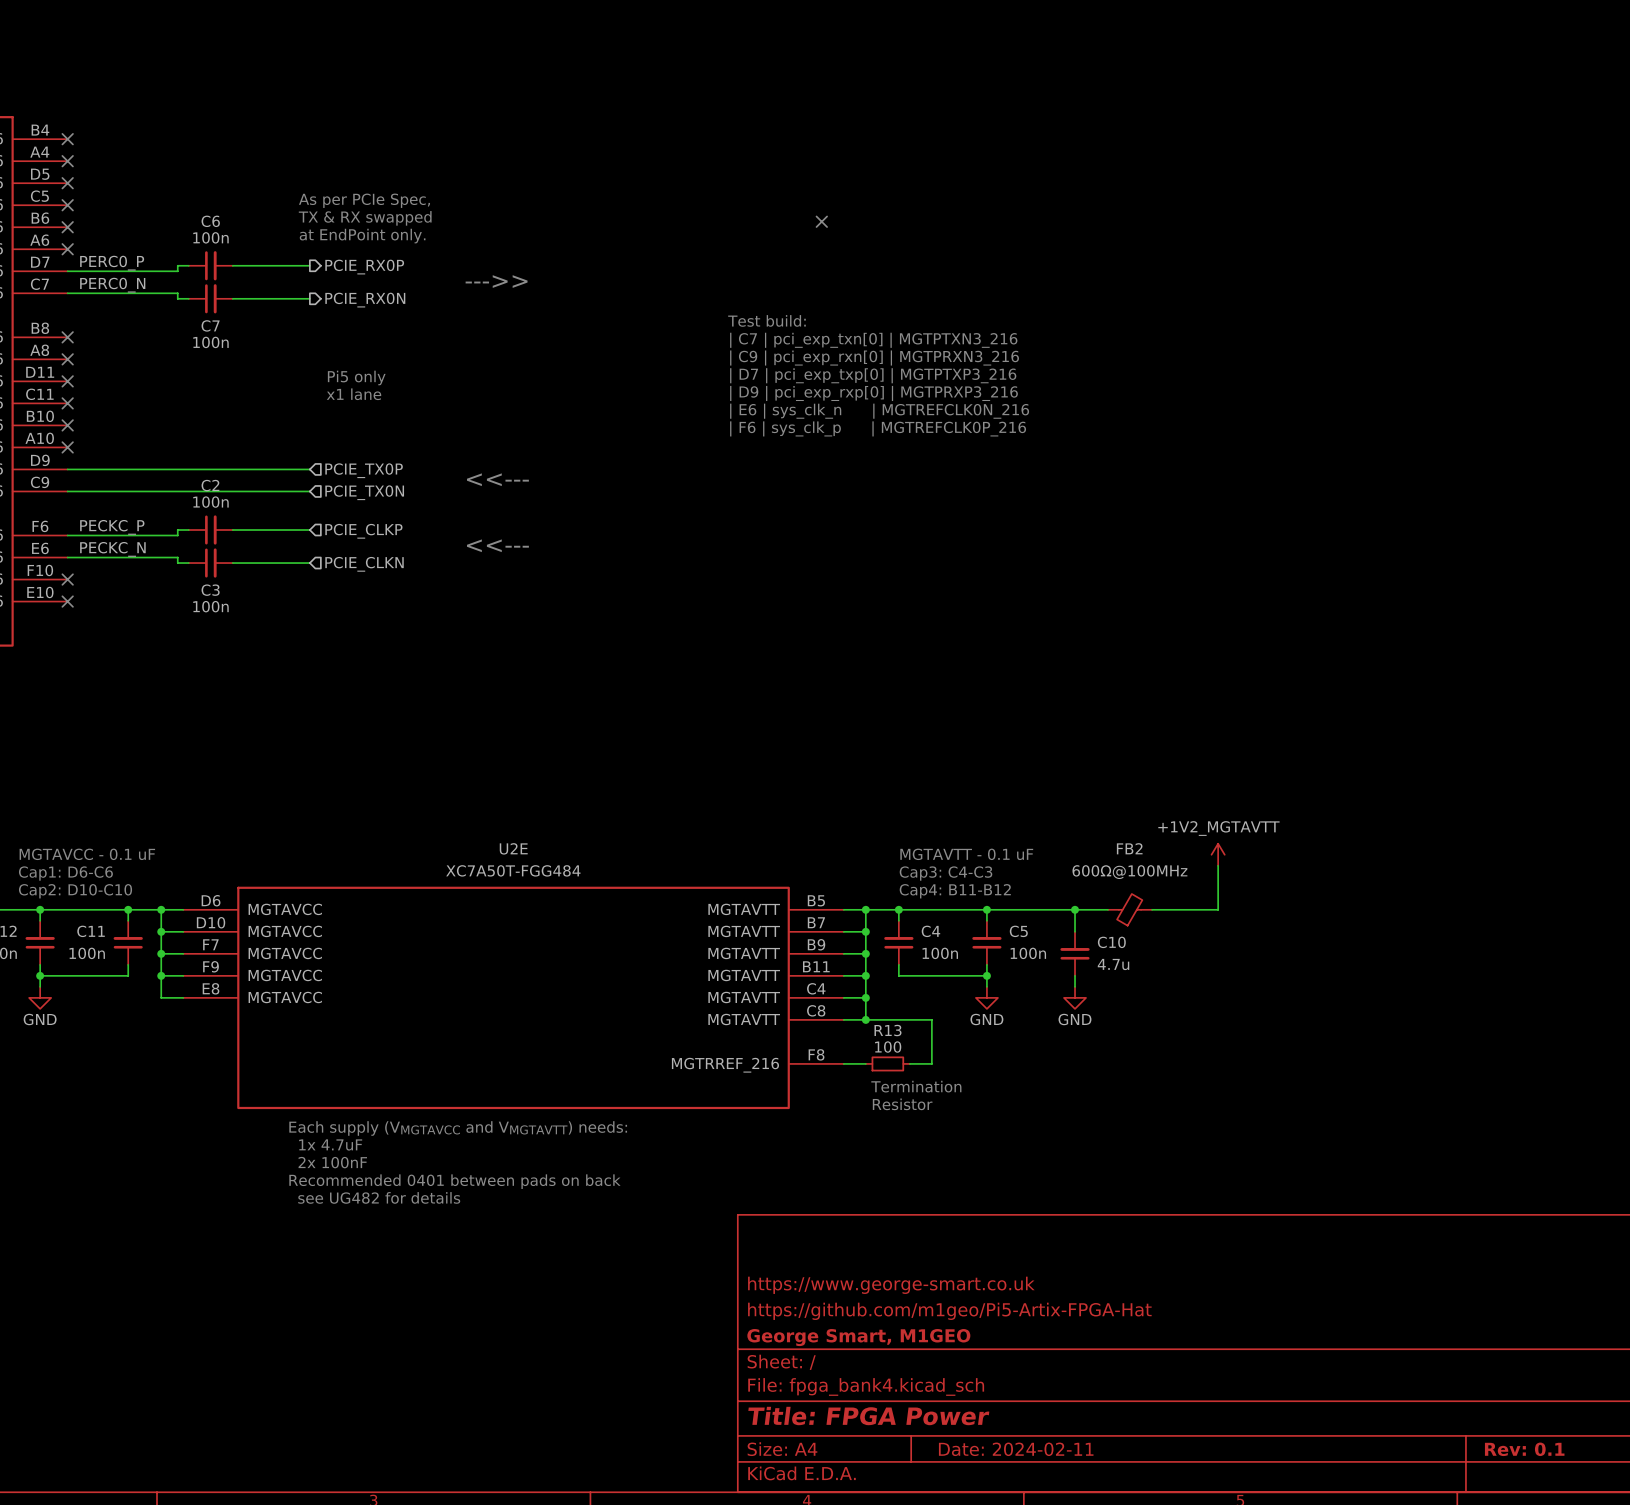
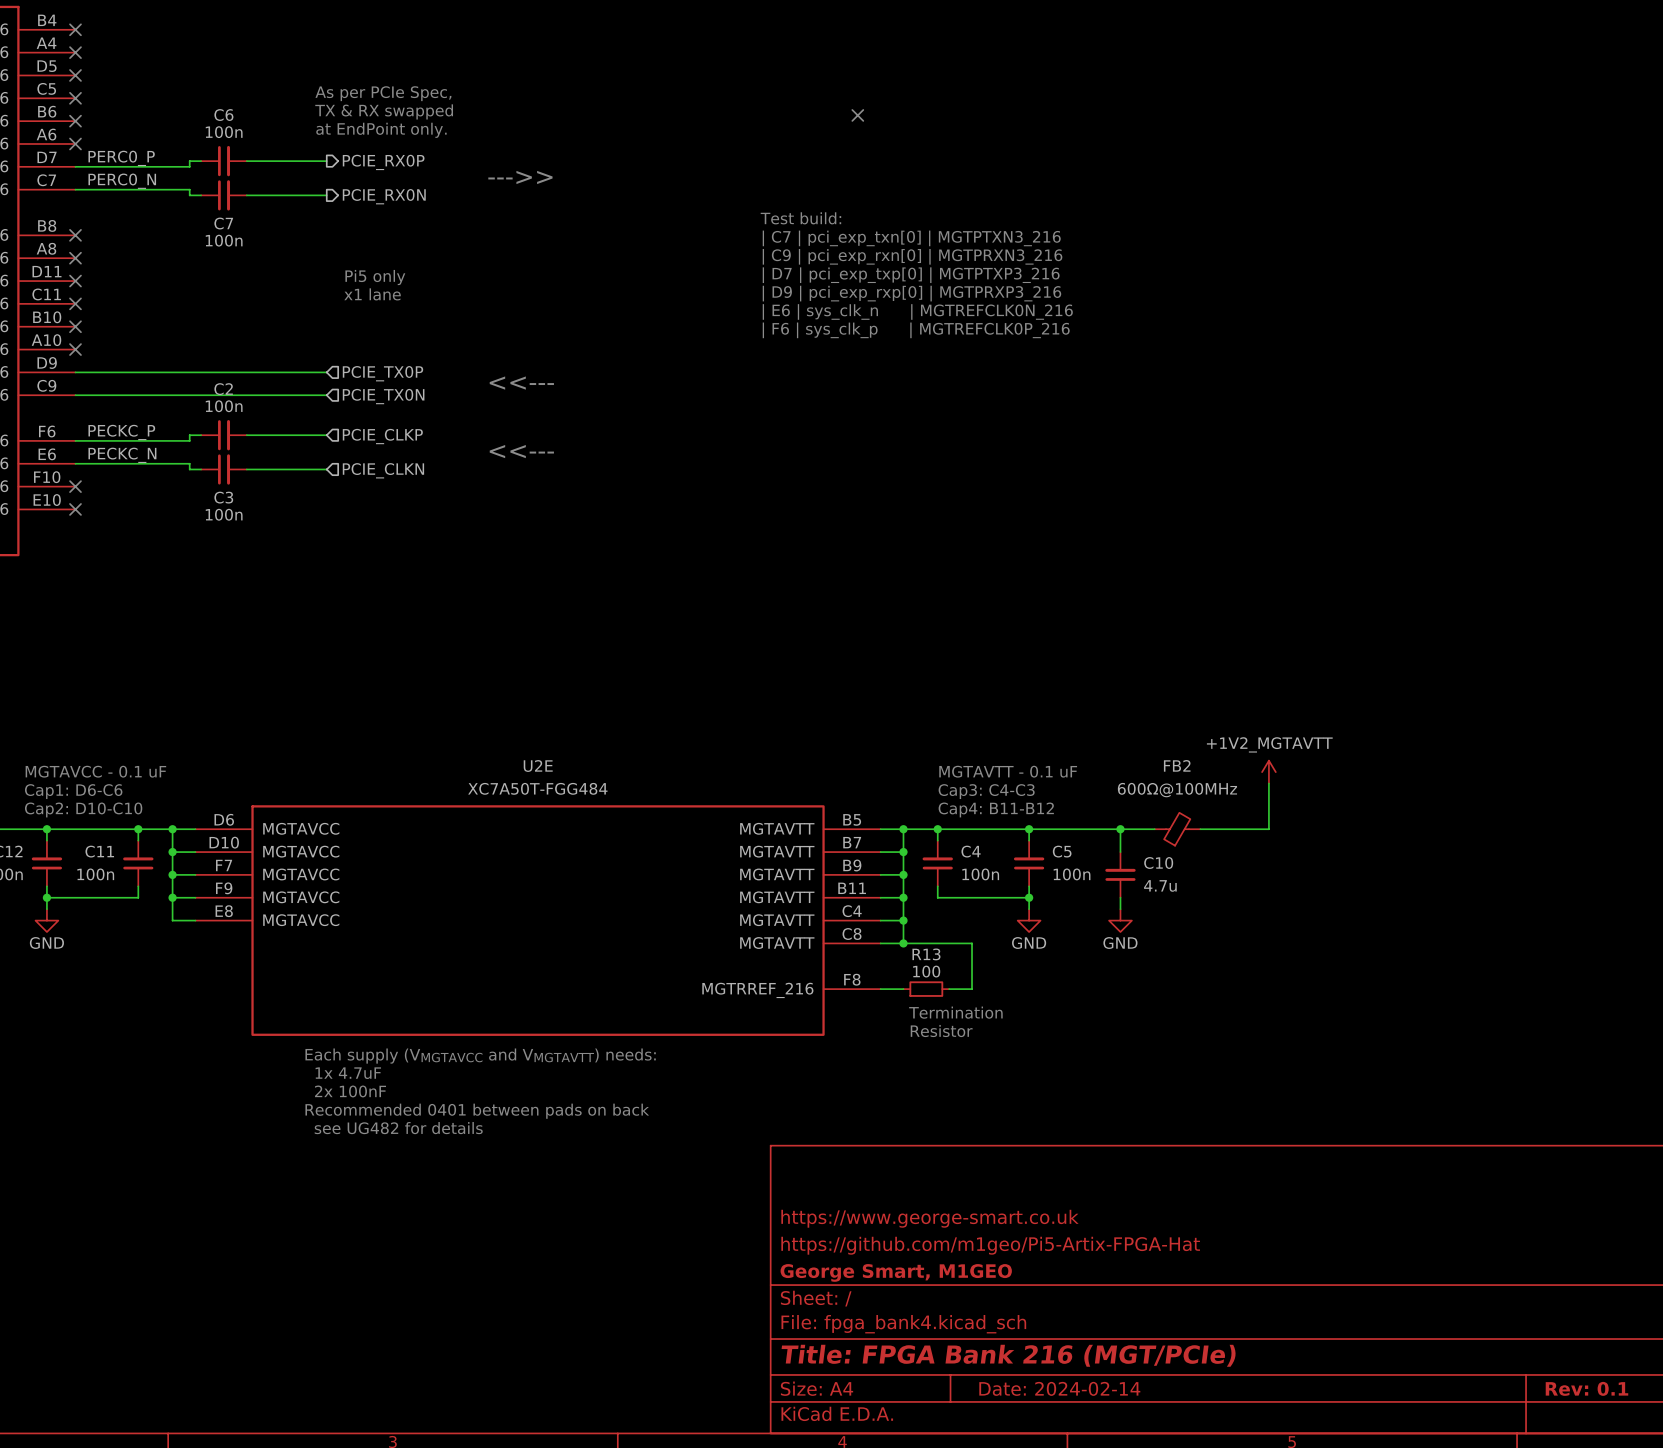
title block: Title: FPGA Power (868, 1416) -> Title: FPGA Bank 216 (MGT/PCIe) (1008, 1355)
title block: Date: 2024-02-11 (1016, 1449) -> Date: 2024-02-14 (1059, 1388)

